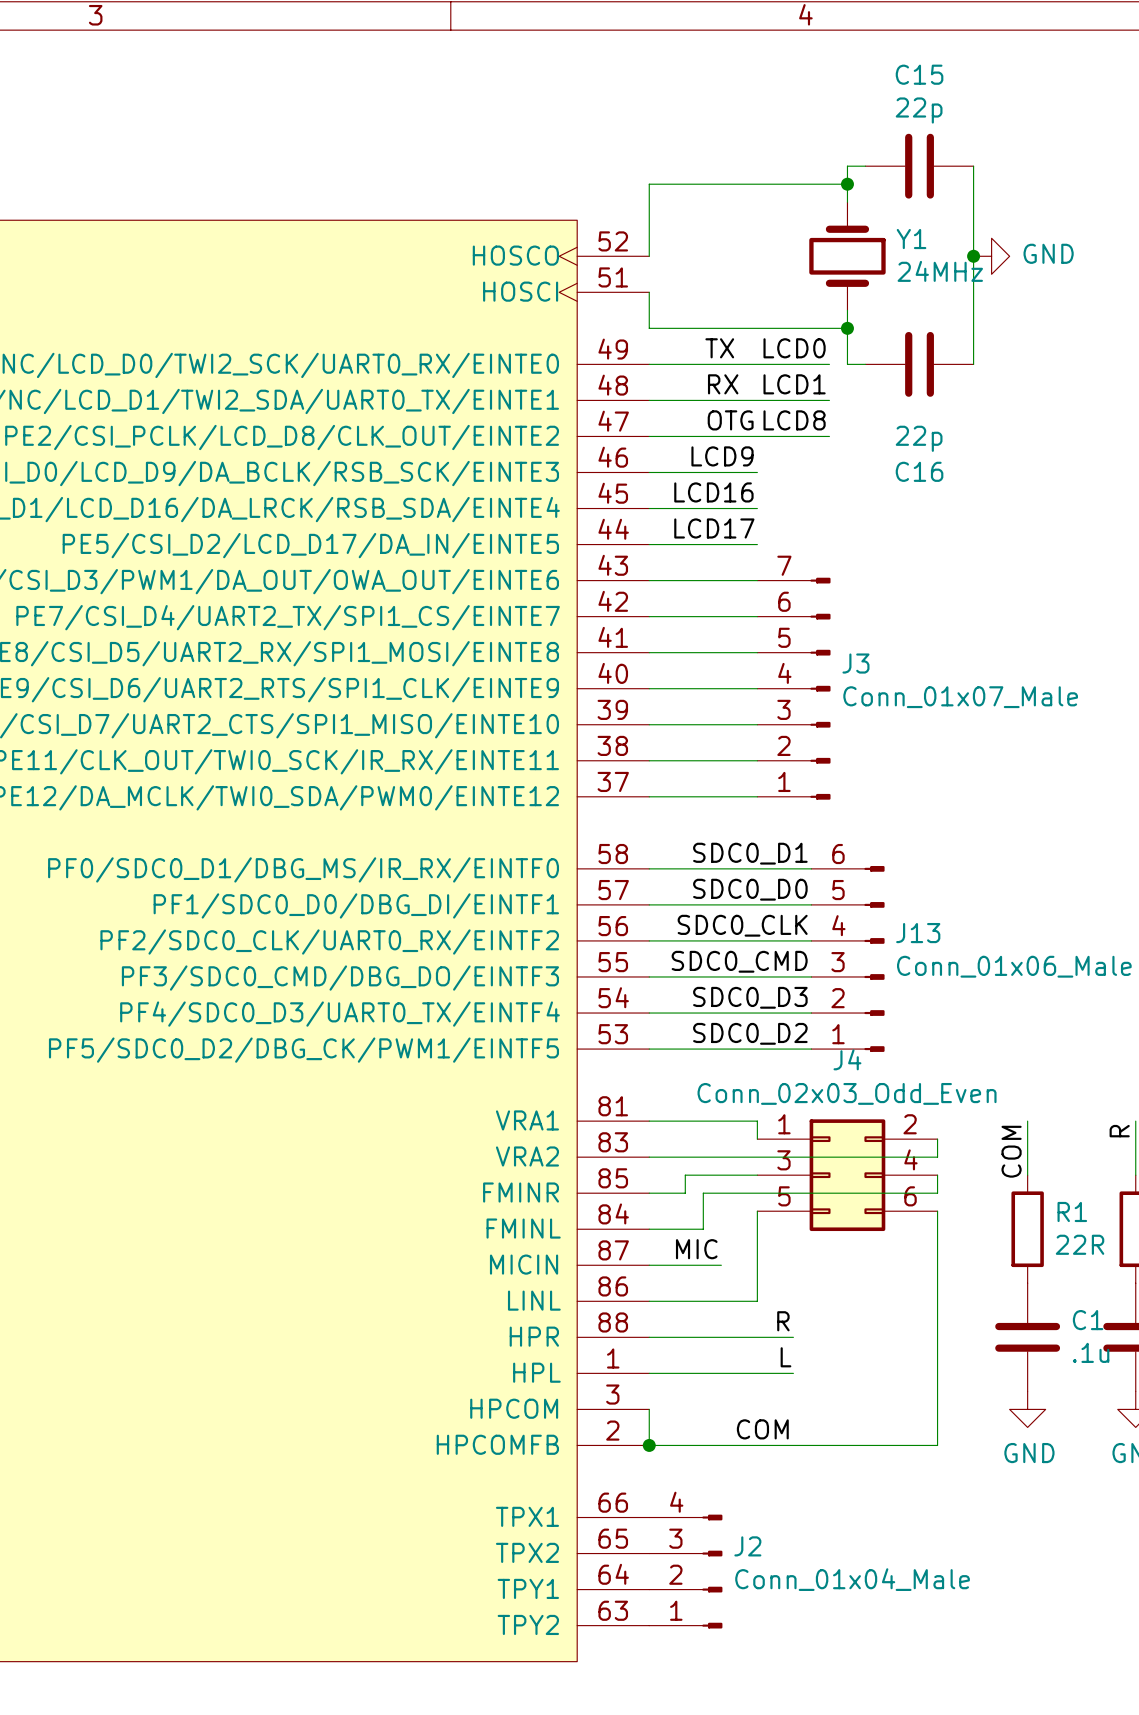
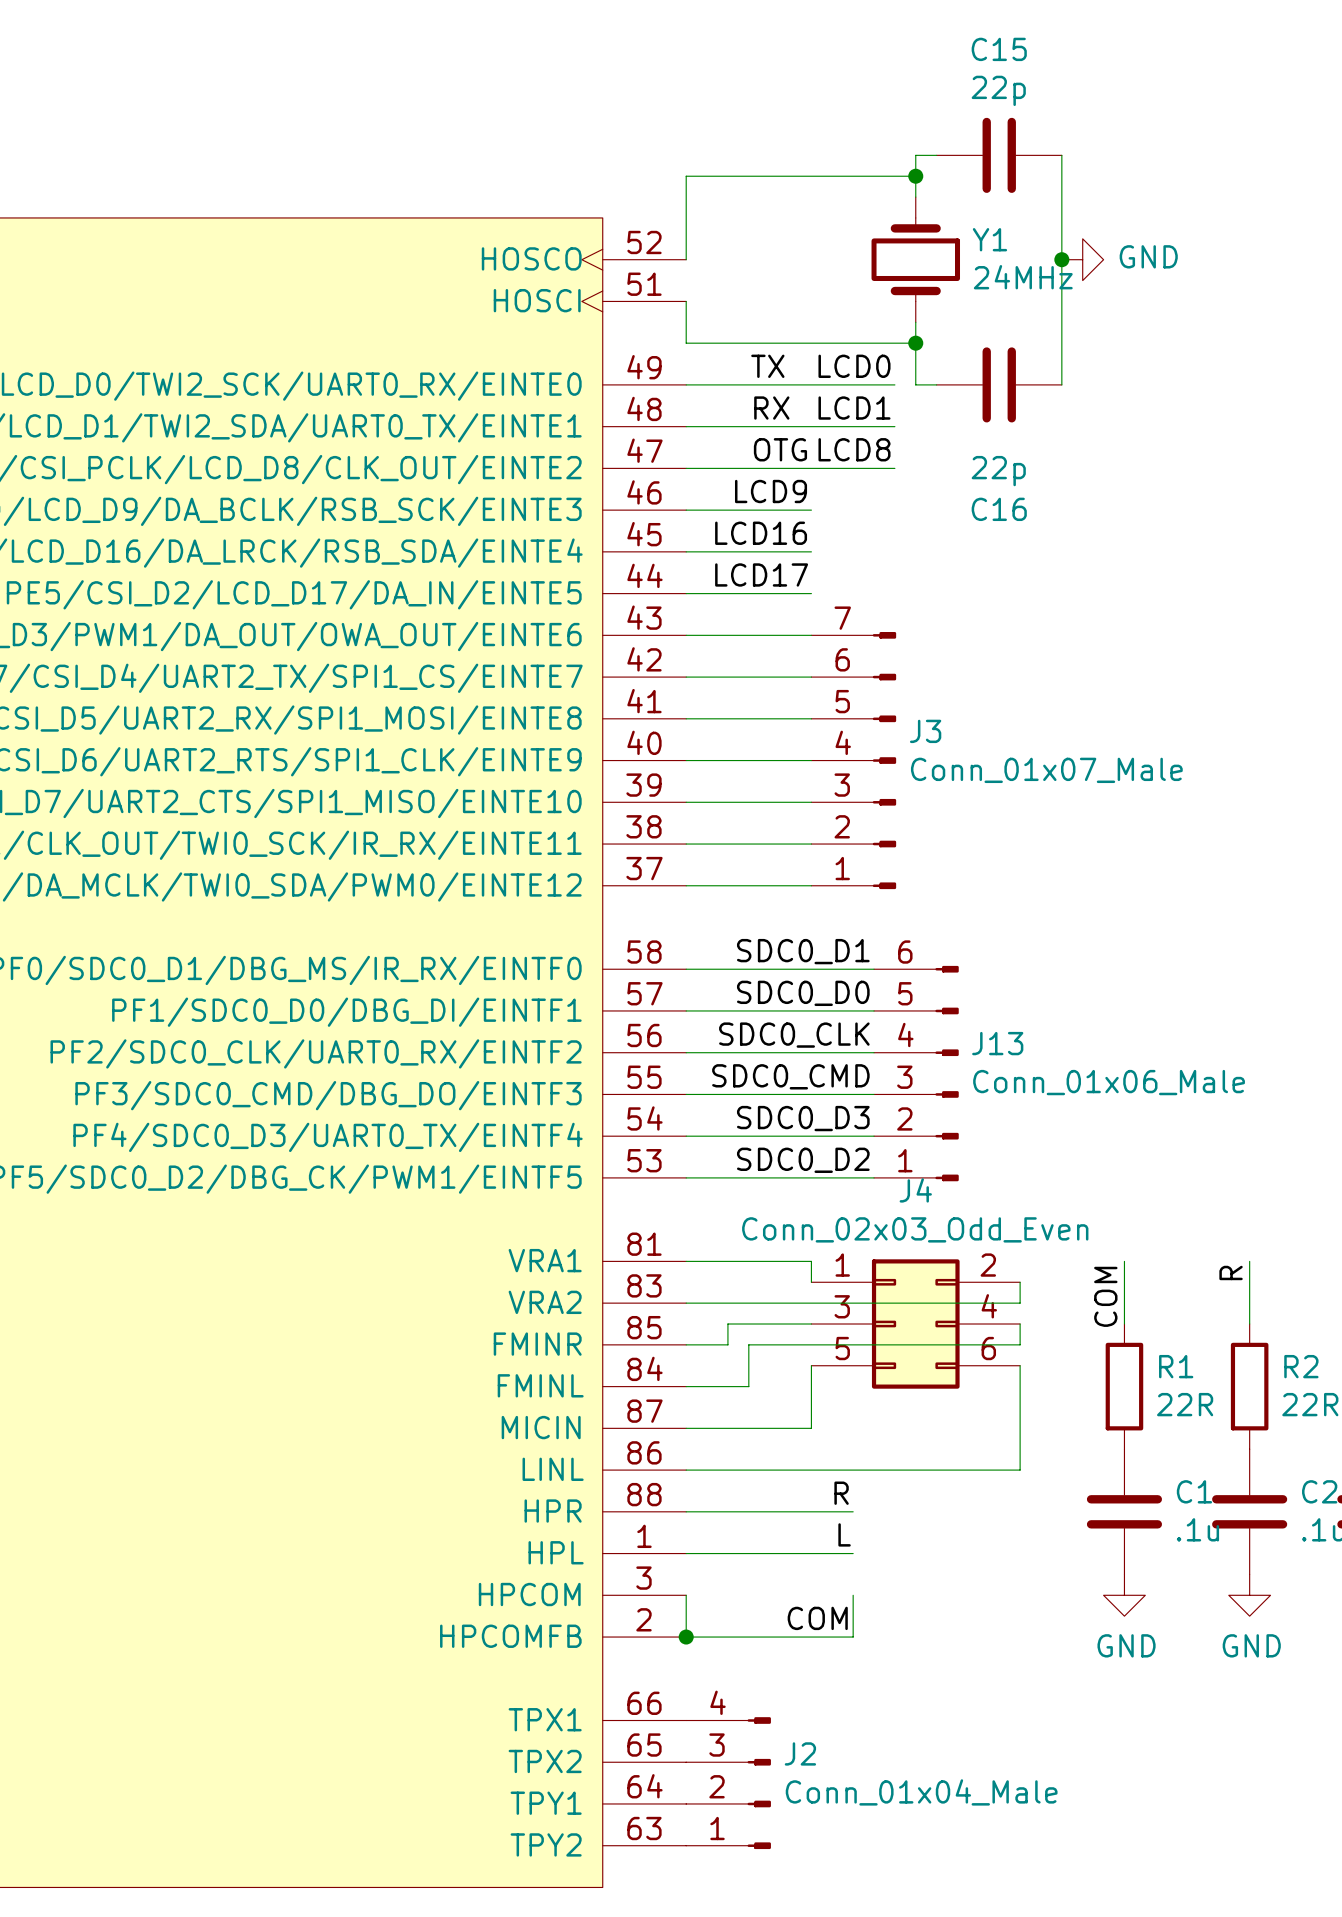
label: MIC (696, 1249) -> none
wire: (757, 1265) (757, 1301) -> (811, 1428) (769, 1428)
wire: (937, 1301) (937, 1445) (793, 1445) -> (1020, 1470) (811, 1470)
wire: none -> (853, 1595) (853, 1637)

